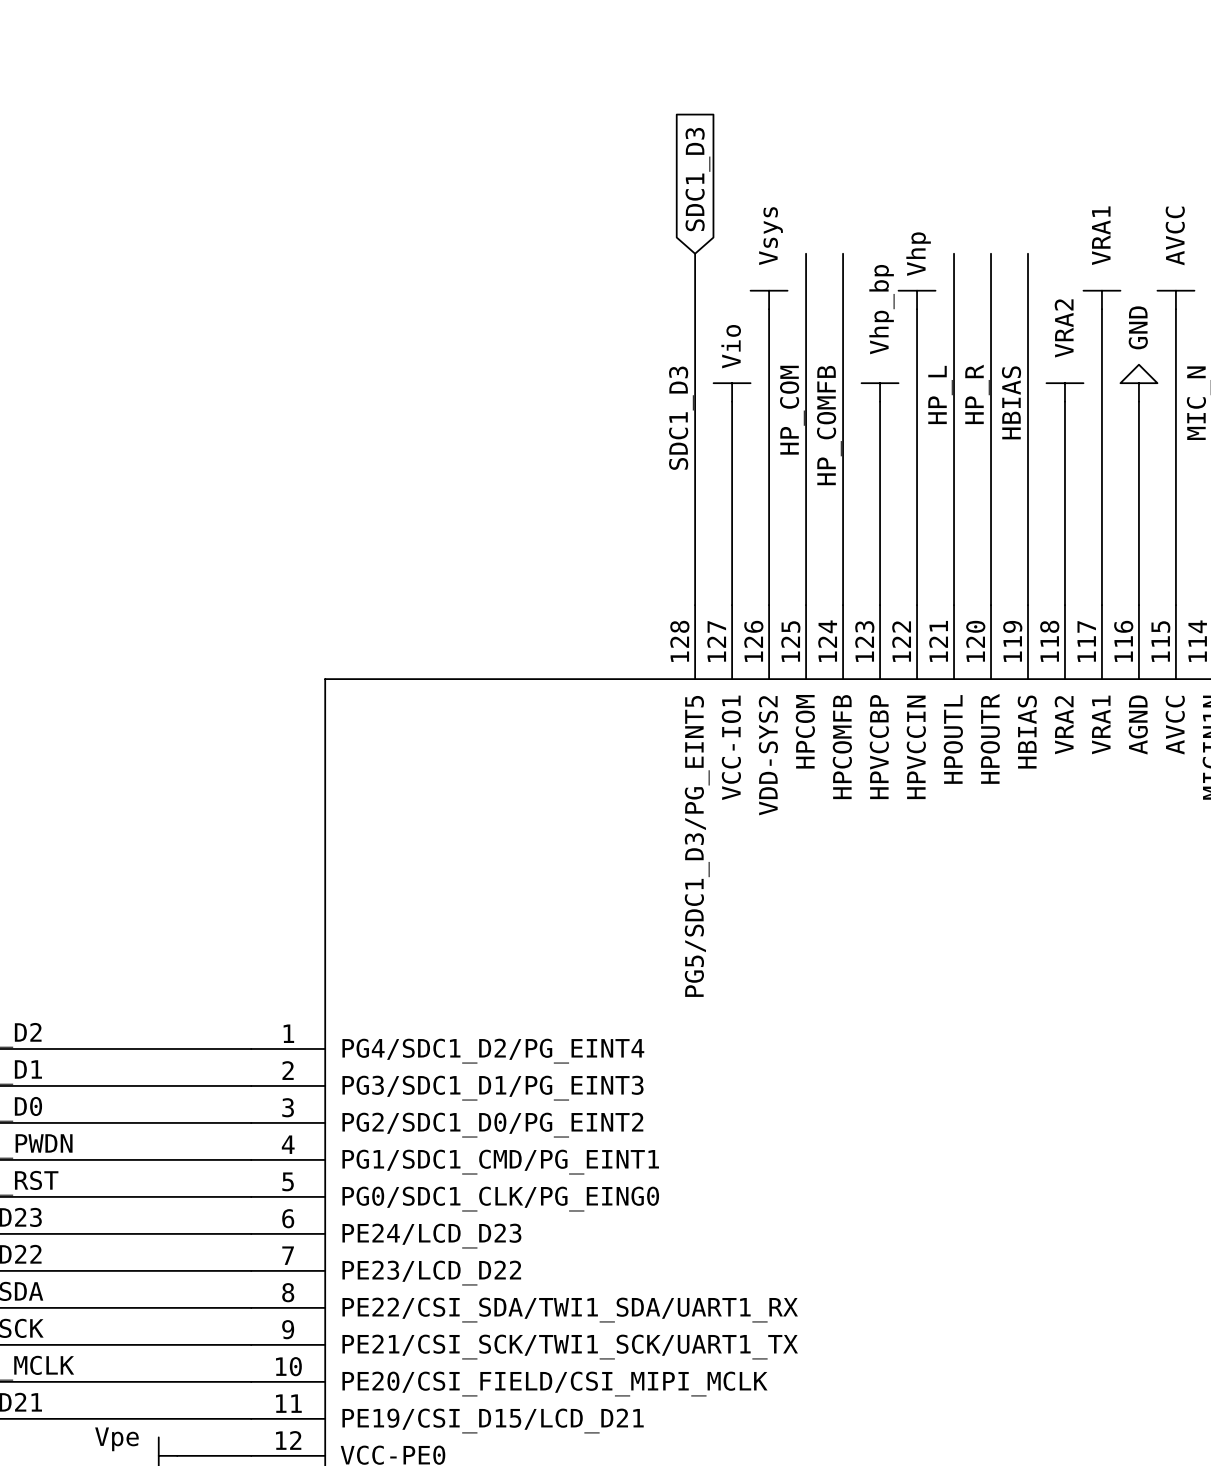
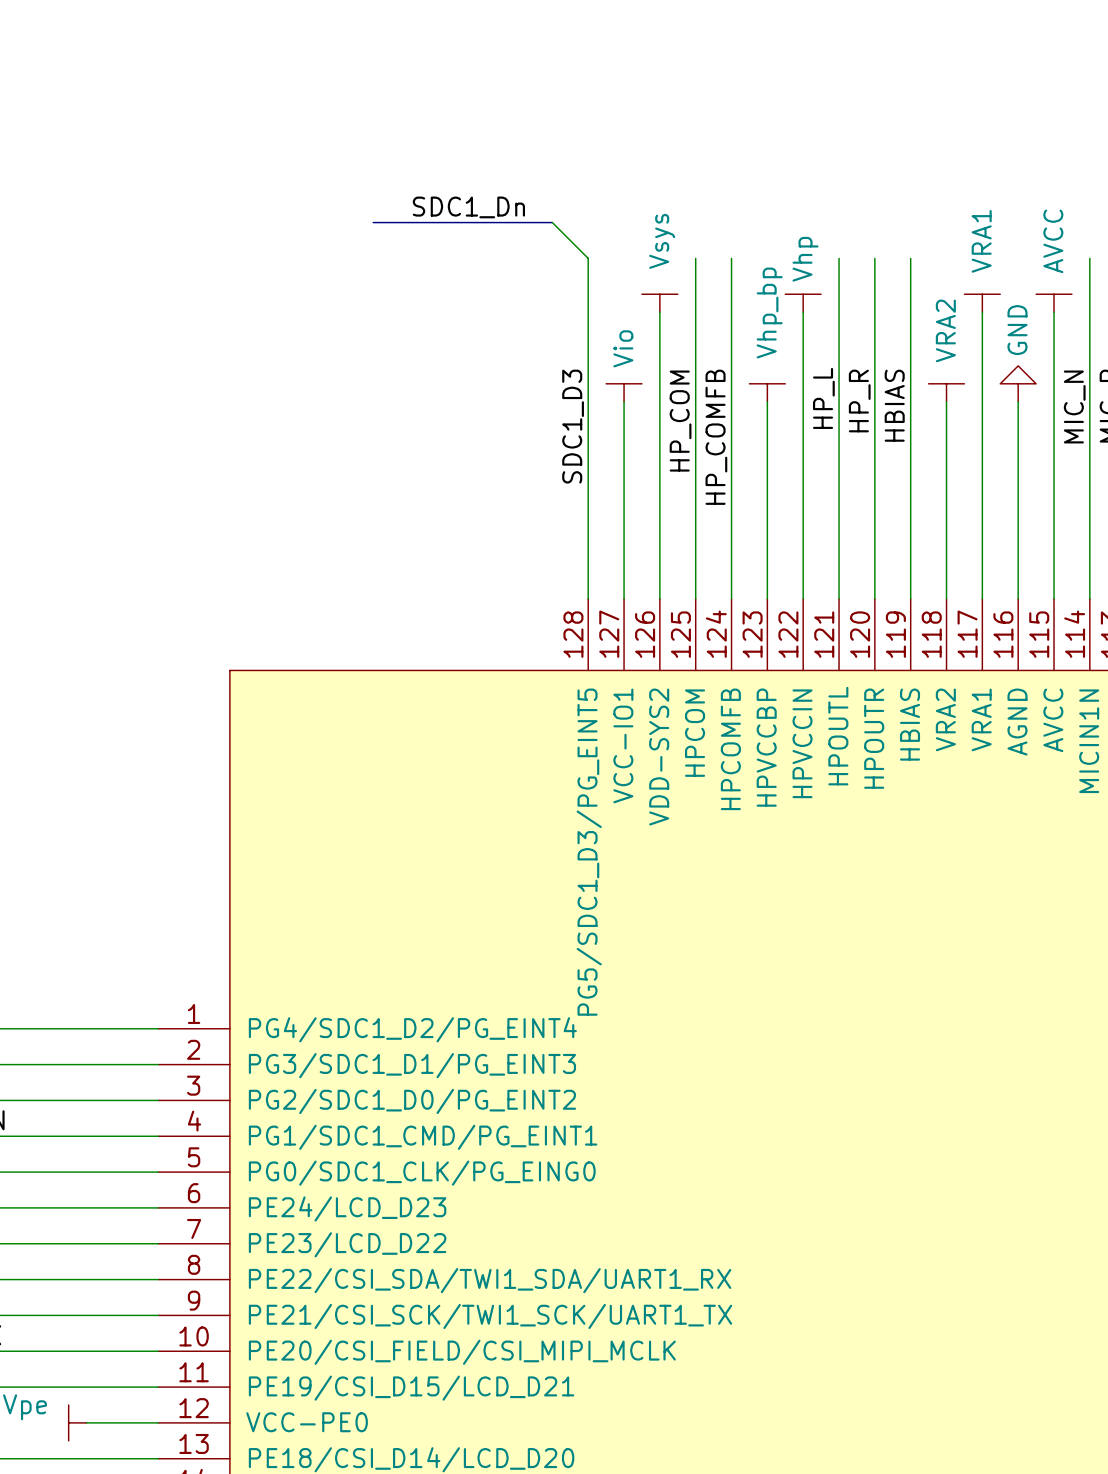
global label: SDC1_D3 (697, 179) -> none
label: none -> SDC1_Dn (468, 207)
bus: none -> (373, 222) (552, 222)
wire: none -> (552, 222) (588, 258)

